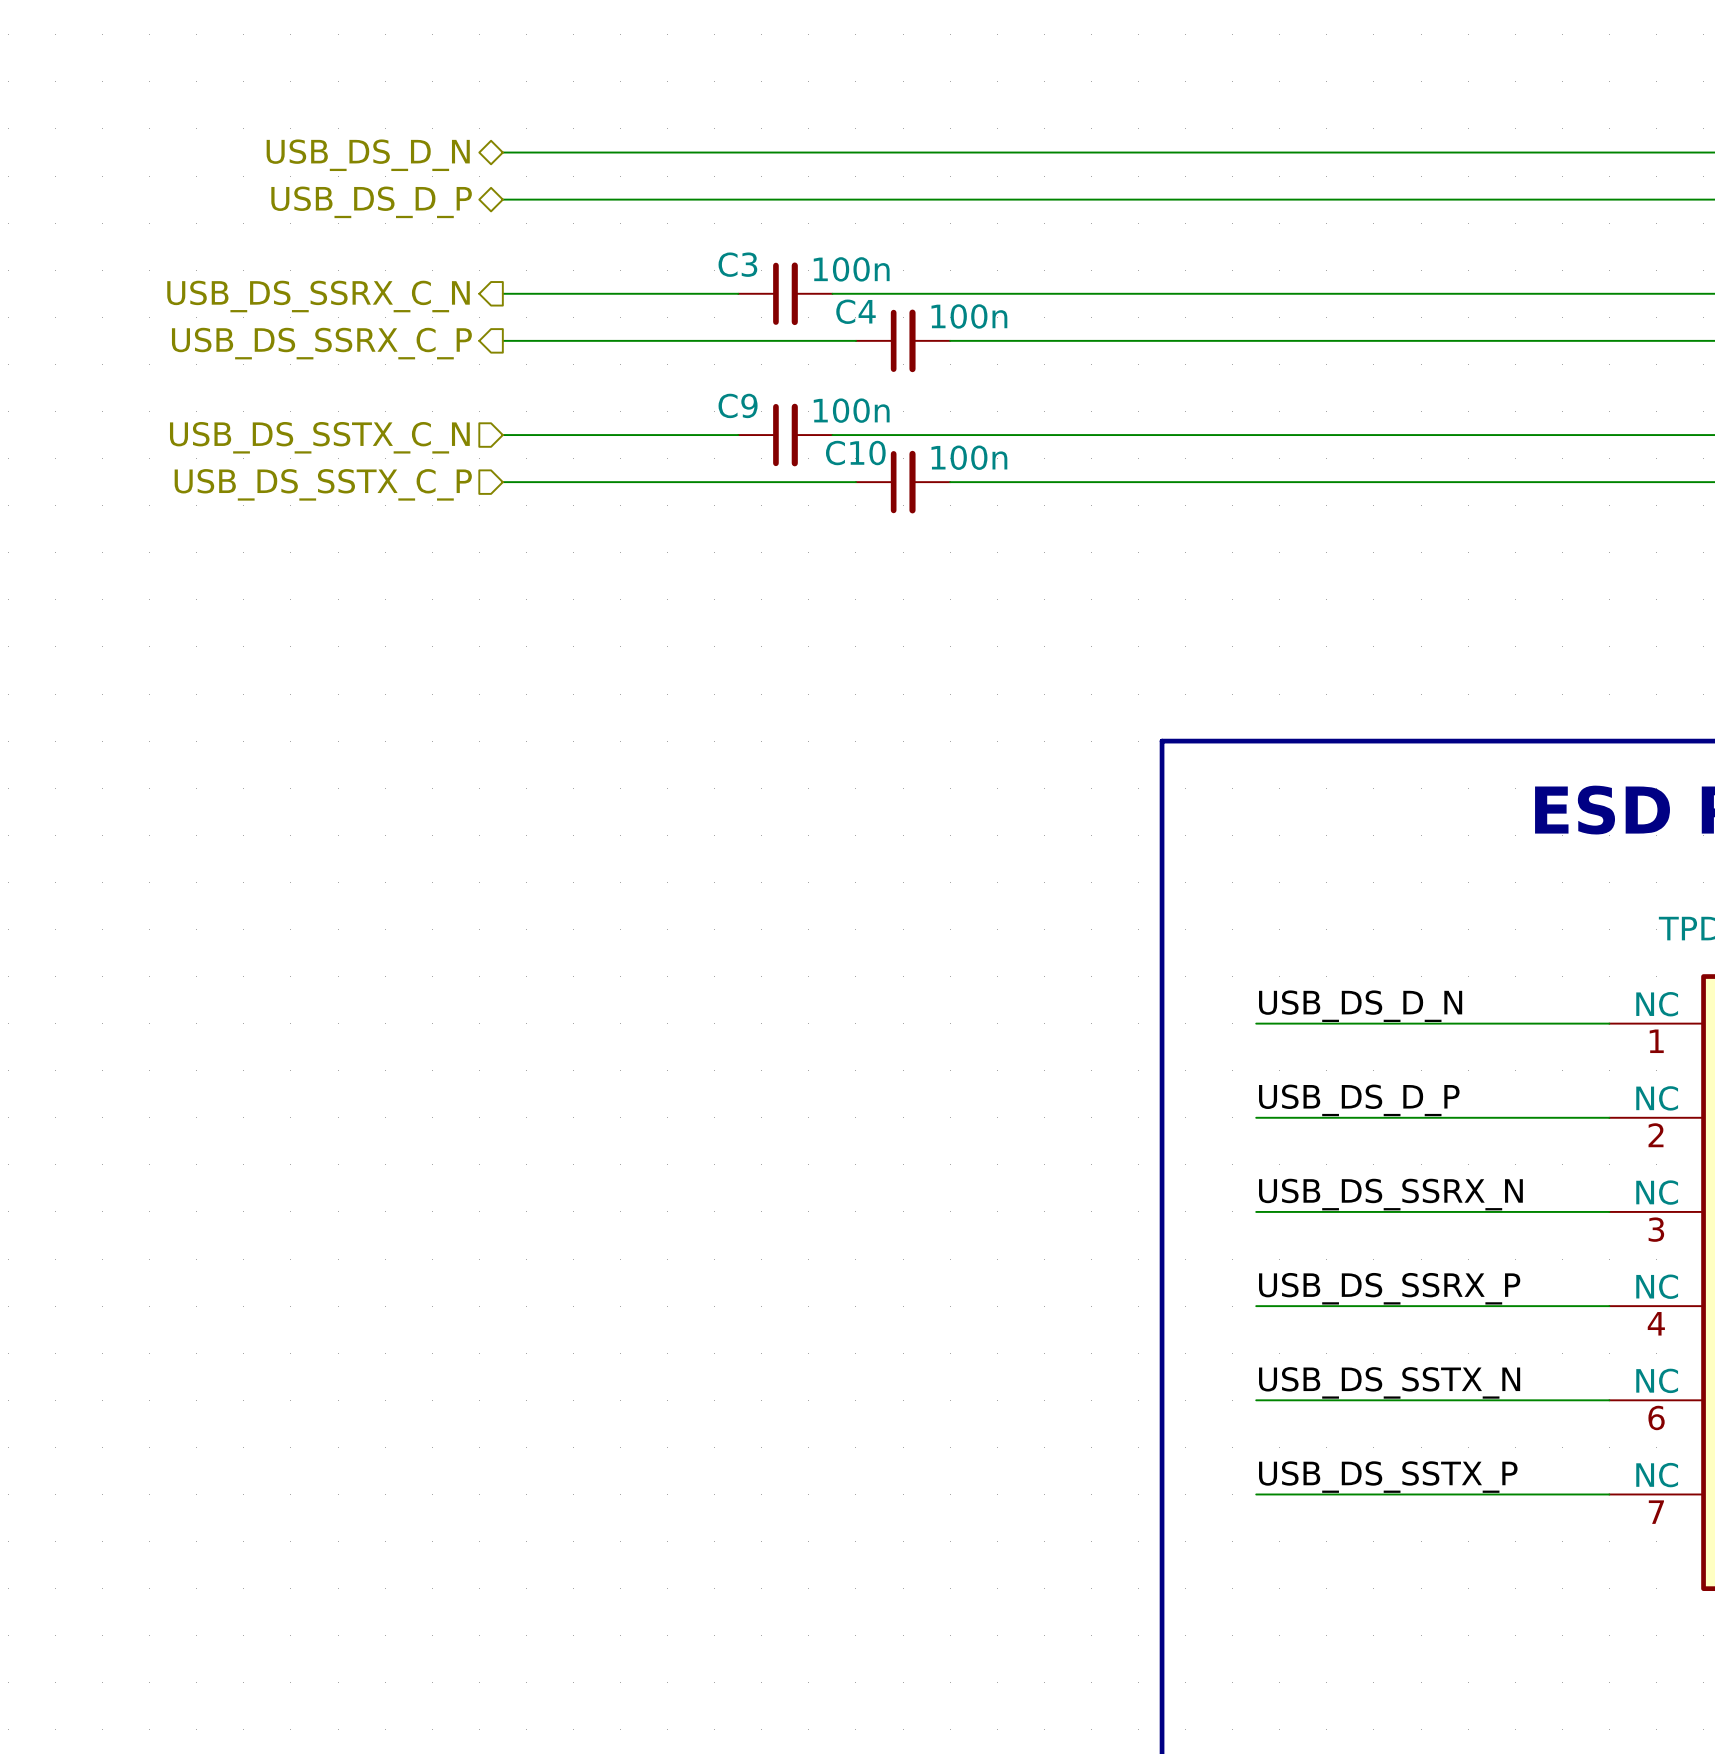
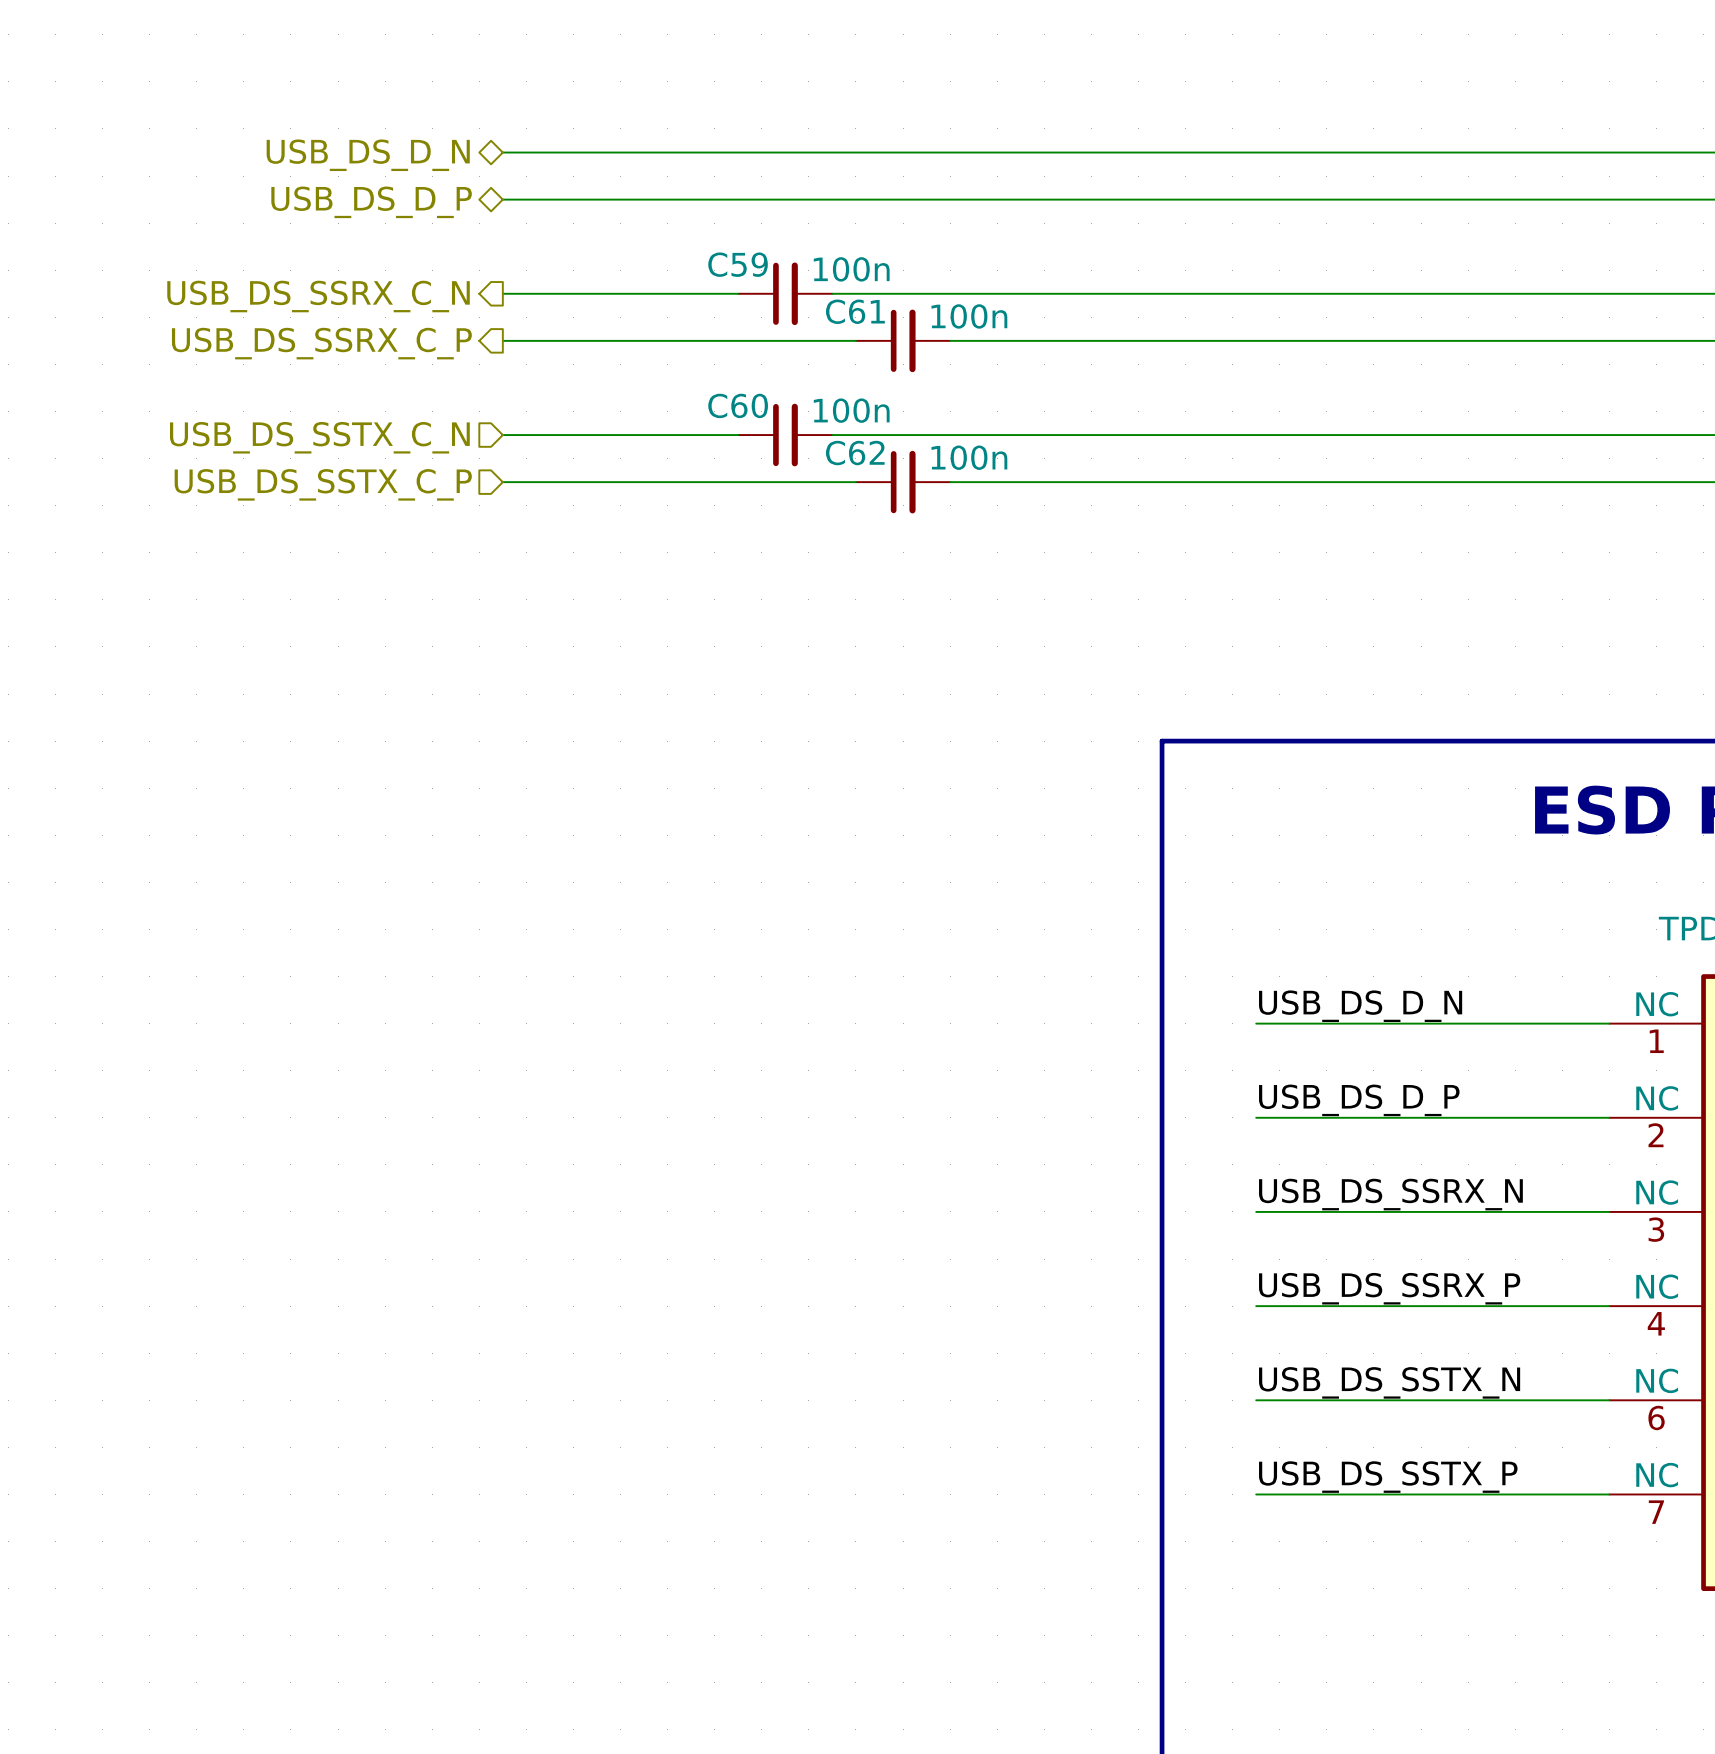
C3 name: C3 (737, 264) -> C59 (738, 264)
C4 name: C4 (855, 311) -> C61 (855, 311)
C9 name: C9 (738, 405) -> C60 (738, 405)
C10 name: C10 (855, 453) -> C62 (855, 453)

